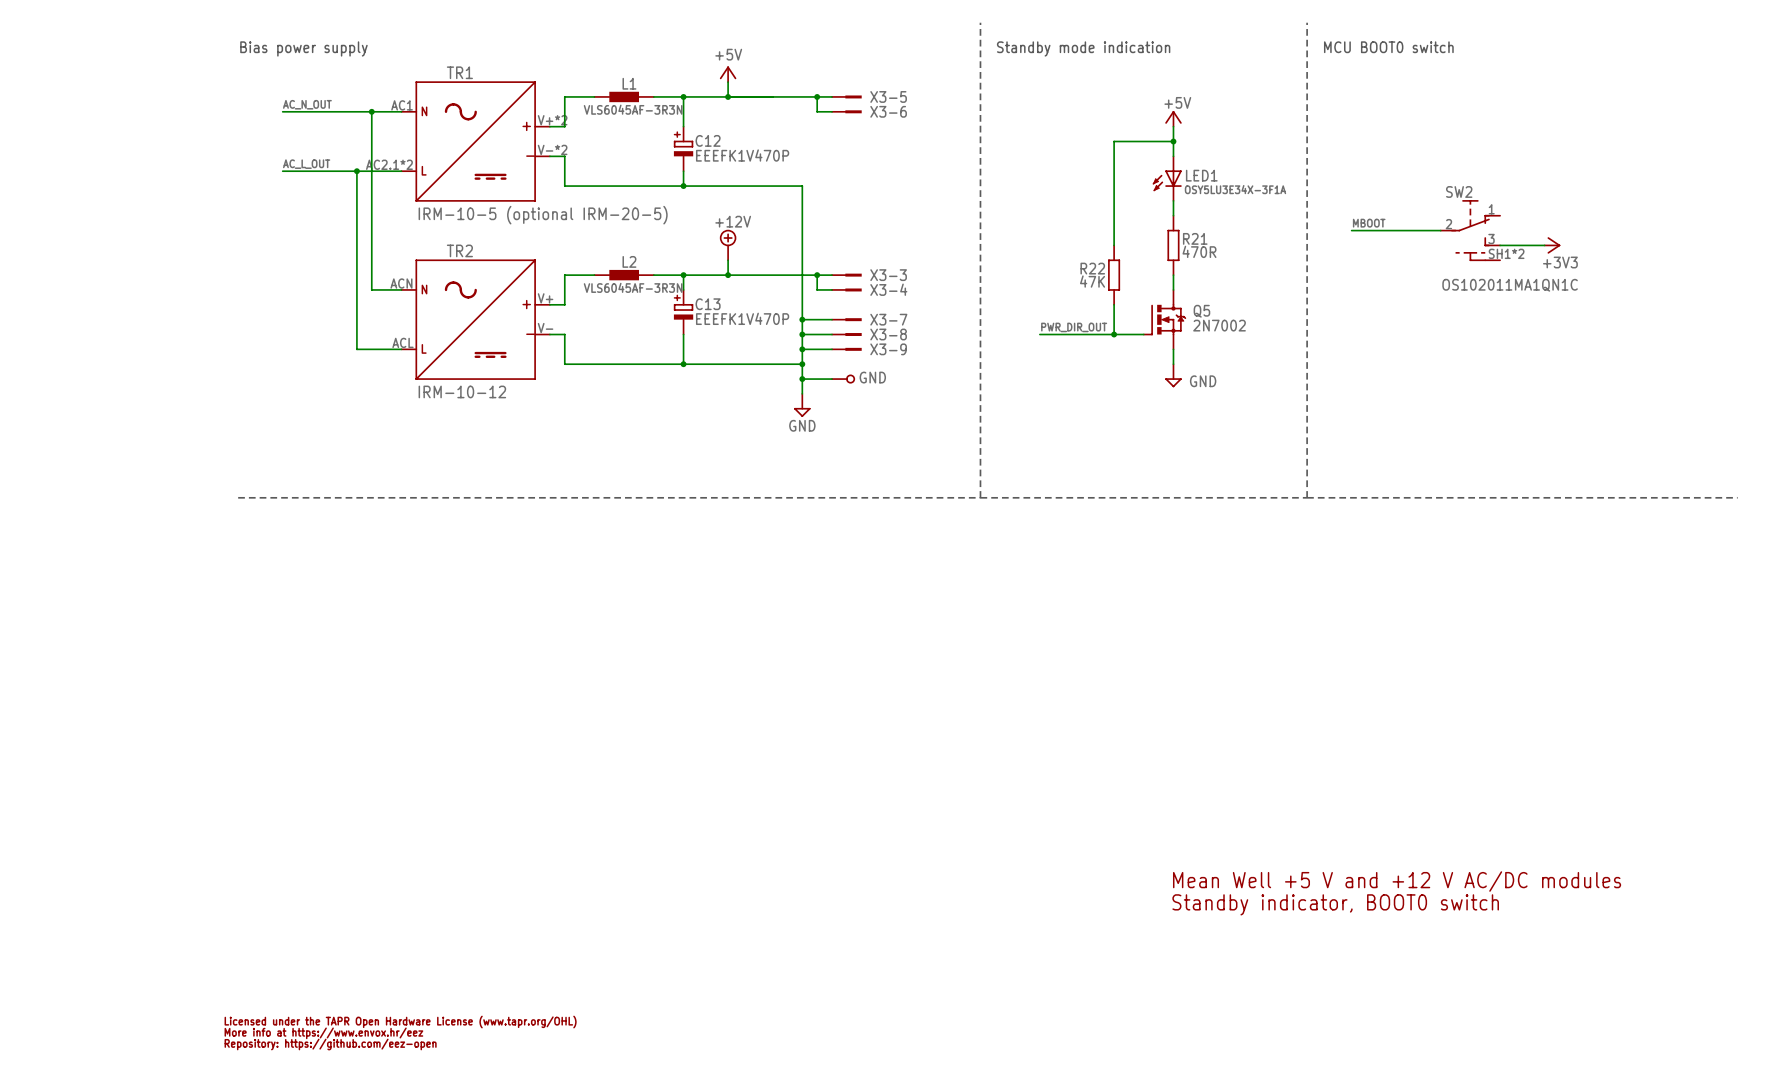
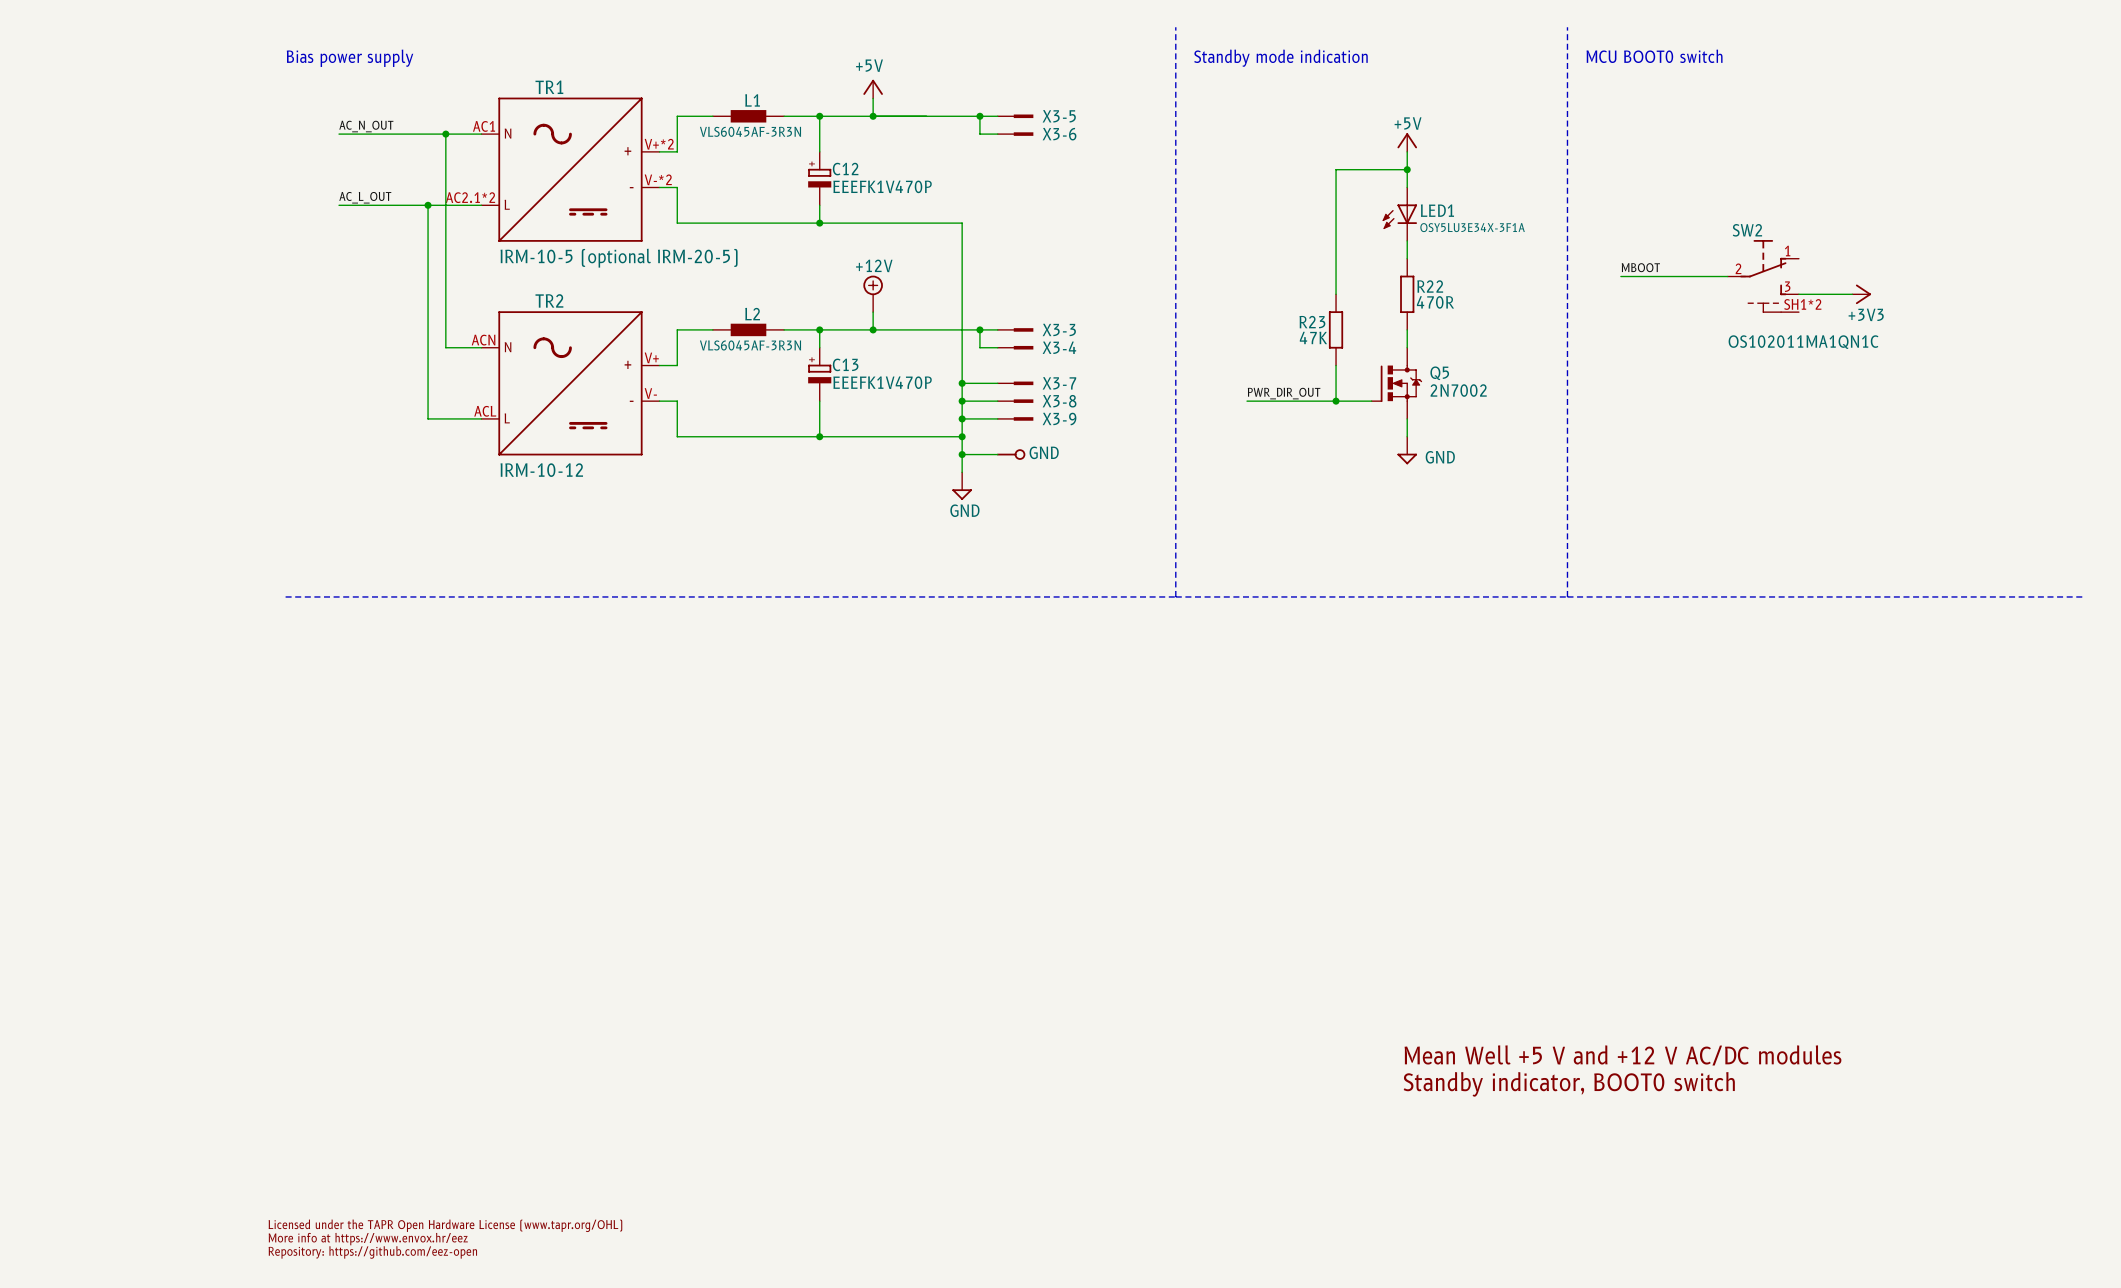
R21 name: R21 (1195, 238) -> R22 (1430, 286)
R22 name: R22 (1092, 268) -> R23 (1312, 322)

